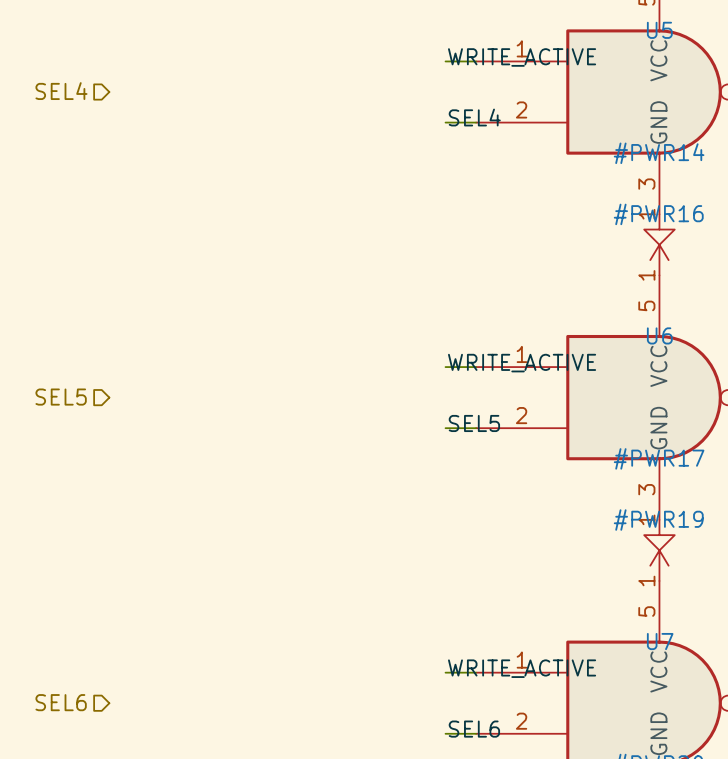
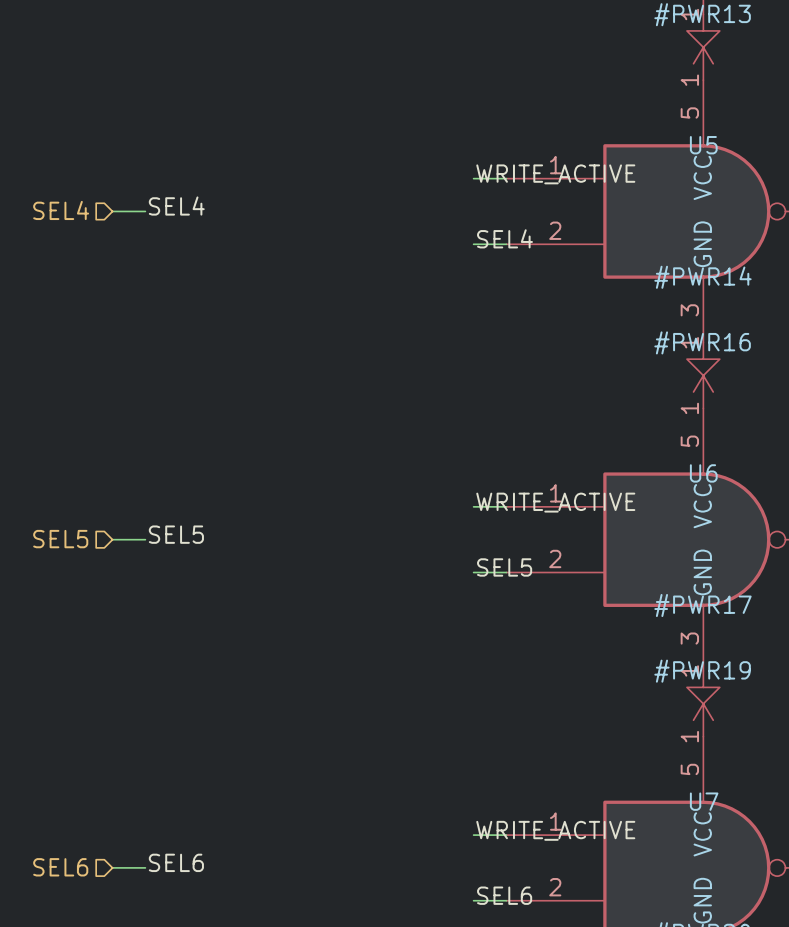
label: none -> SEL4 (176, 206)
wire: none -> (112, 211) (145, 211)
label: none -> SEL5 (176, 534)
wire: none -> (112, 539) (145, 539)
label: none -> SEL6 (176, 862)
wire: none -> (112, 867) (145, 867)

